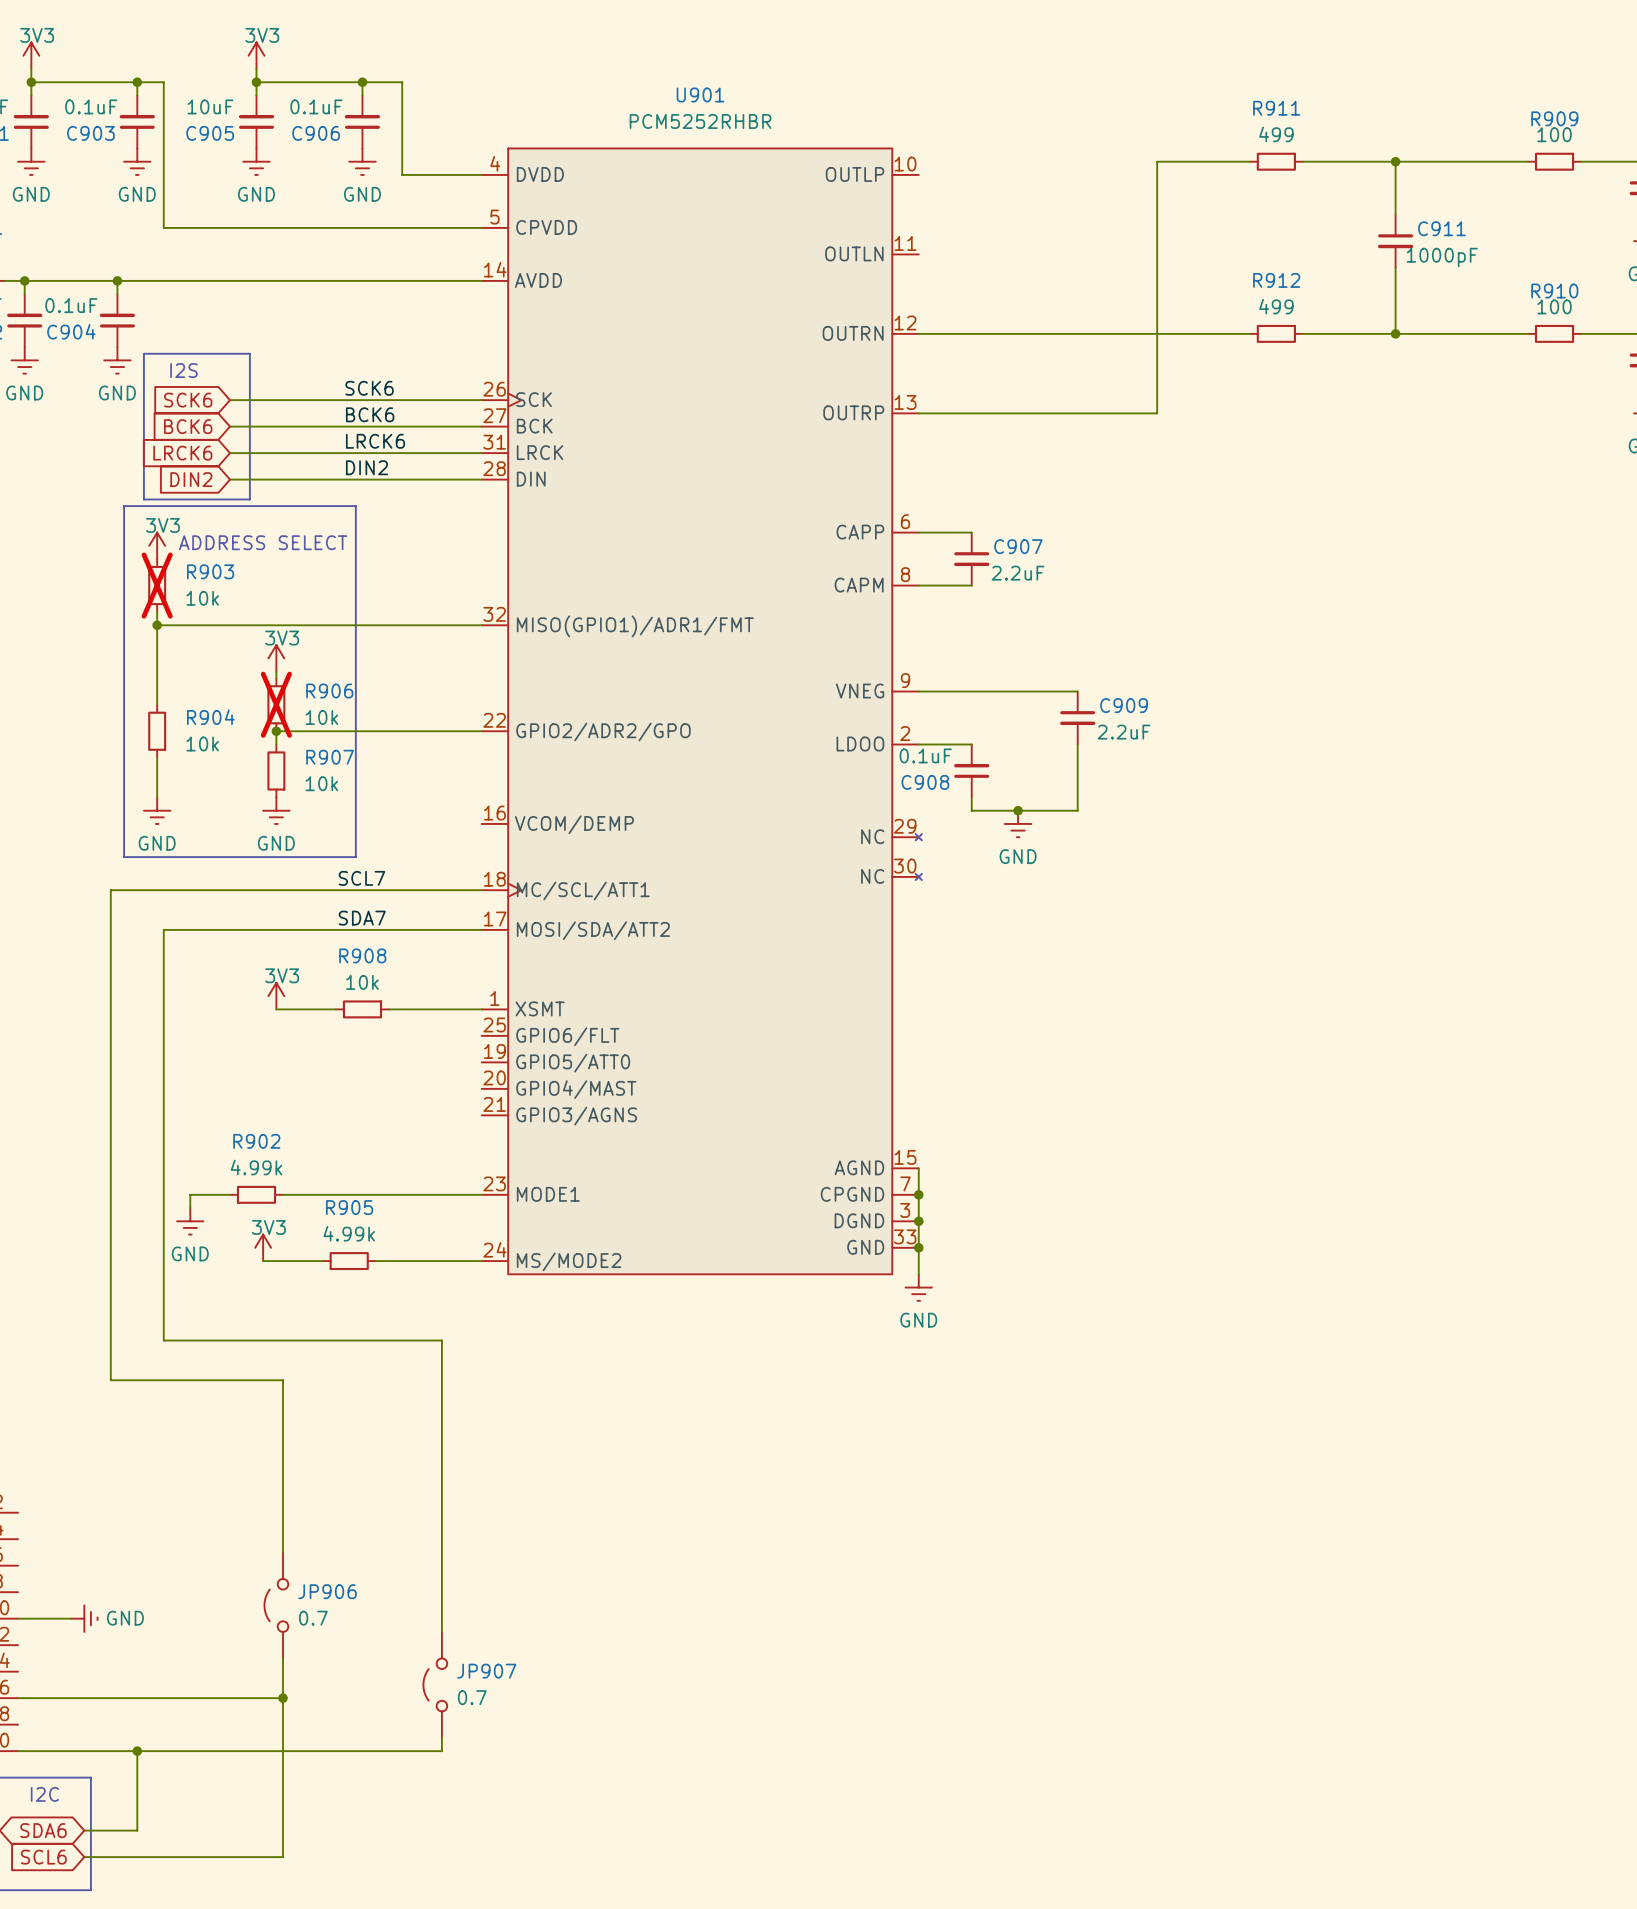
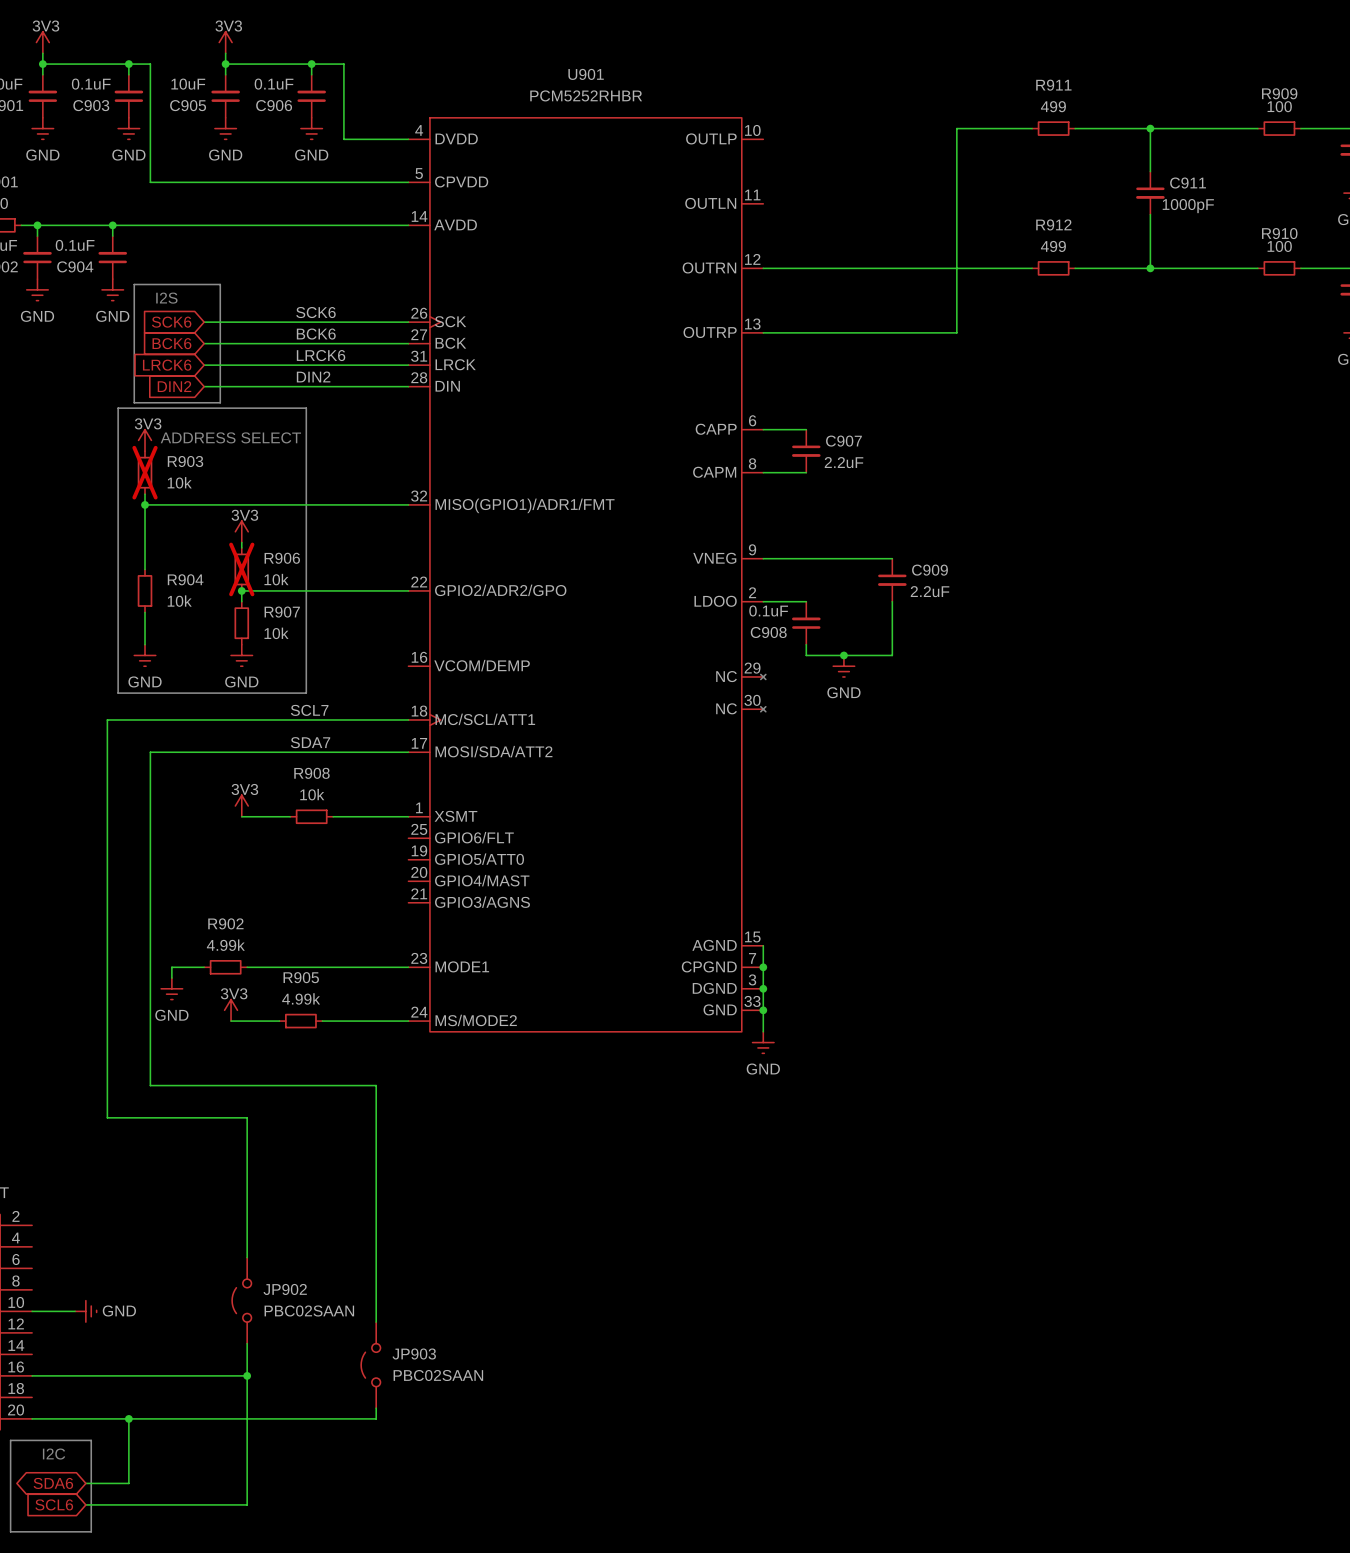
JP906 name: JP906 (327, 1591) -> JP902 (285, 1289)
JP906 value: 0.7 (313, 1618) -> PBC02SAAN (309, 1310)
JP907 name: JP907 (486, 1671) -> JP903 (414, 1353)
JP907 value: 0.7 (472, 1697) -> PBC02SAAN (438, 1375)

